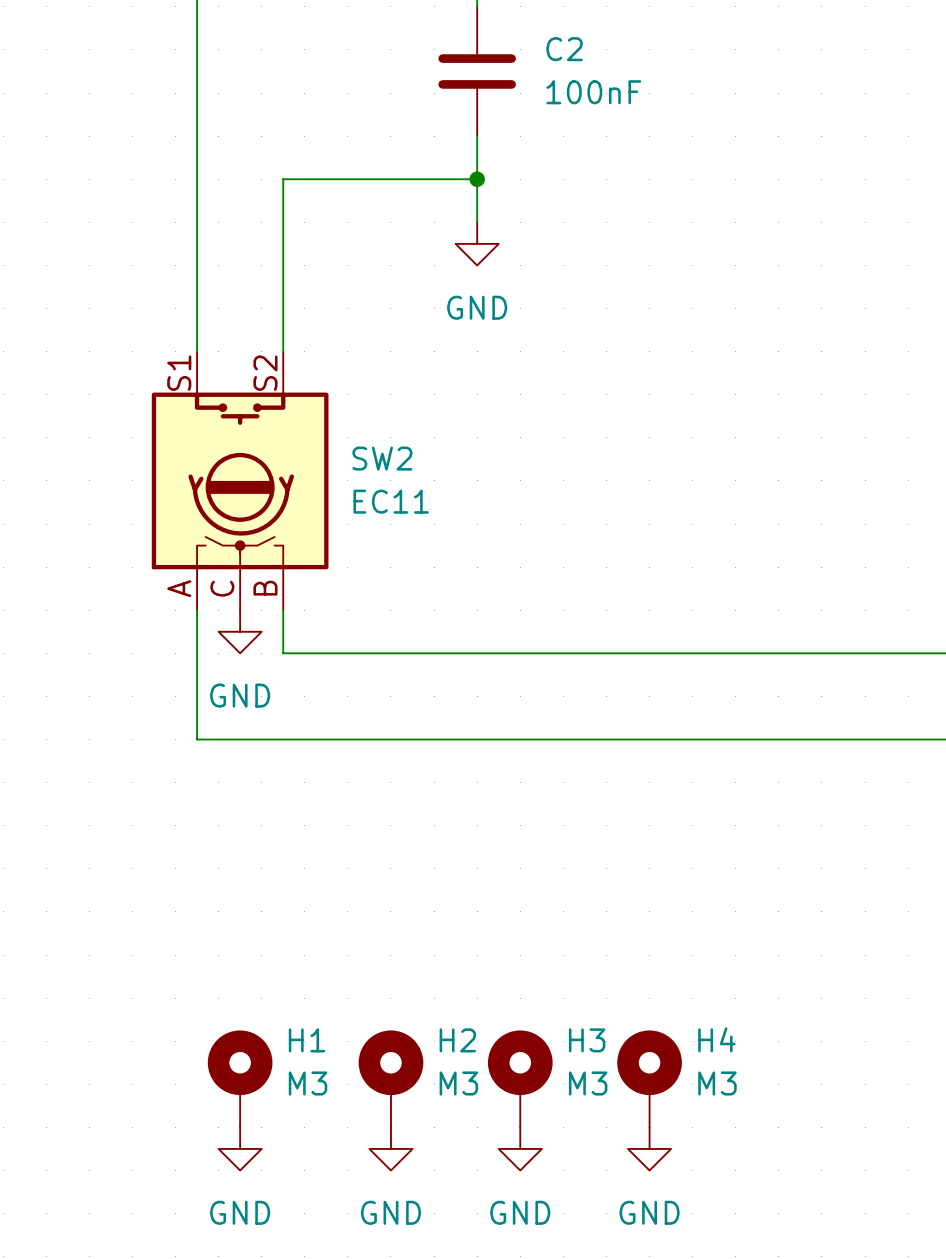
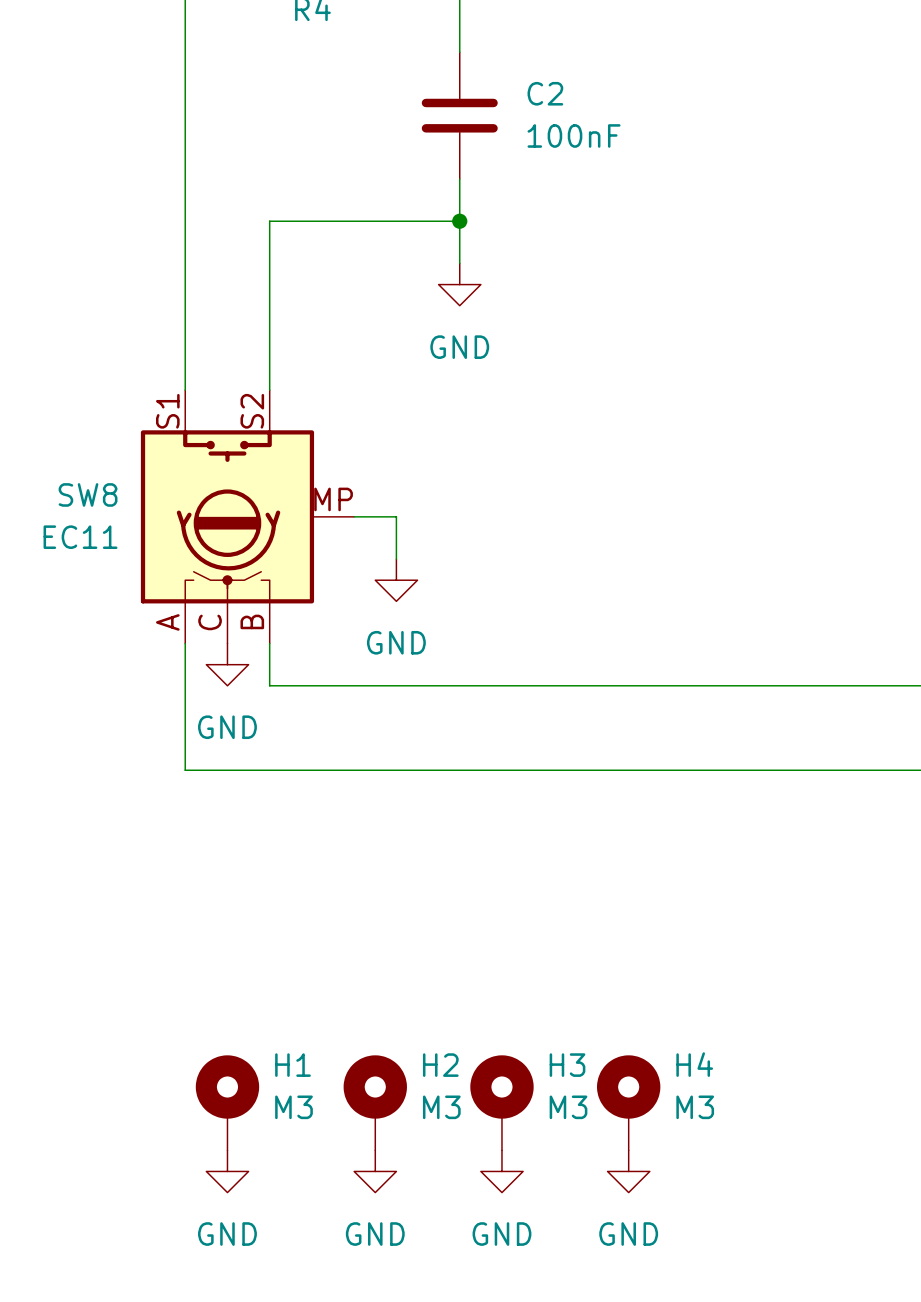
SW2: EC11 (240, 480) -> none
SW8: none -> EC11 (247, 516)
wire: none -> (354, 516) (396, 516) (396, 559)
power symbol: none -> GND (396, 580)

